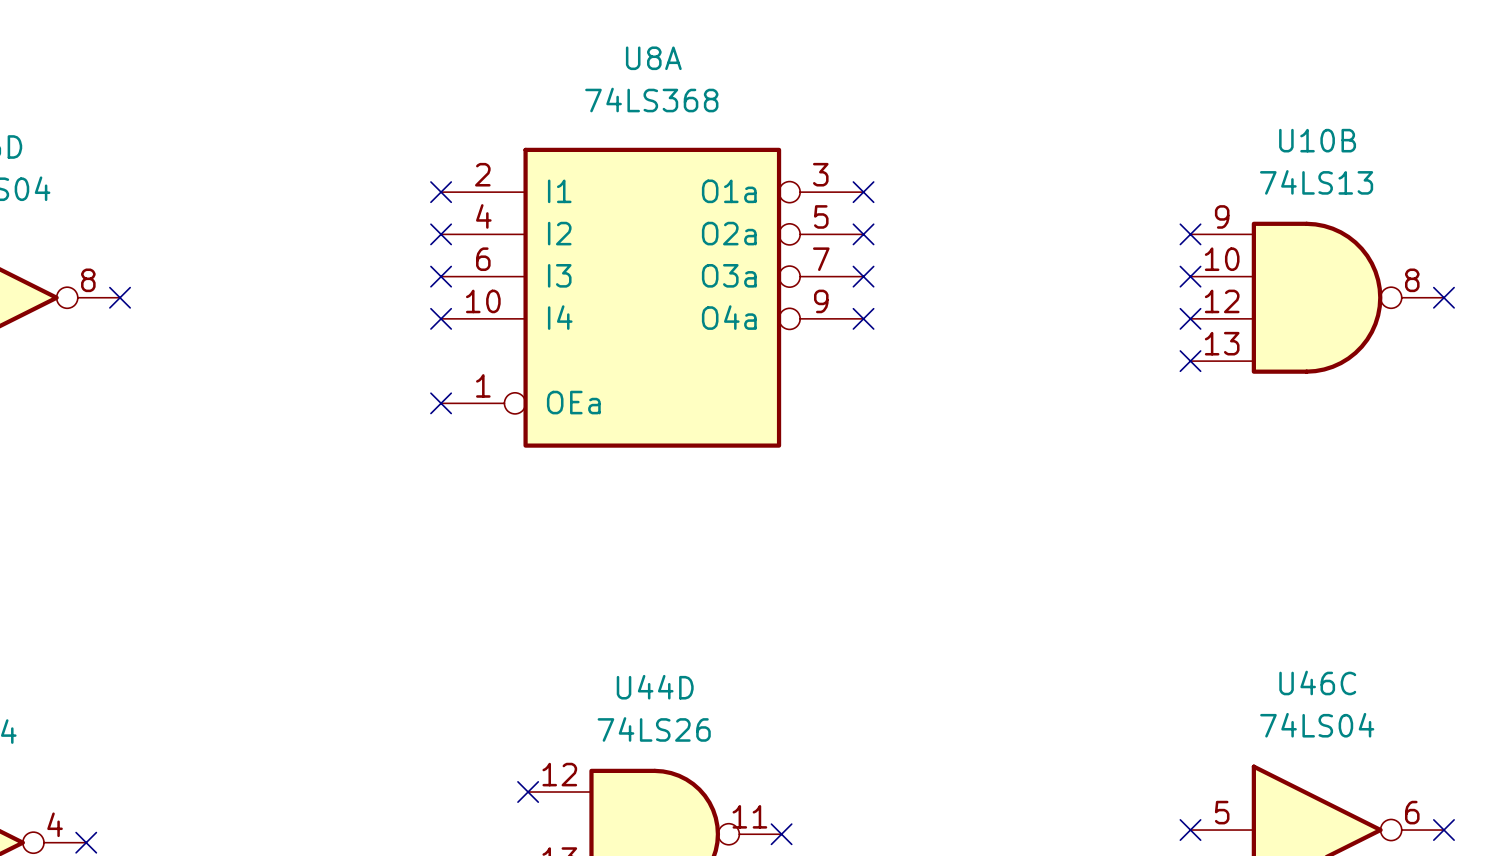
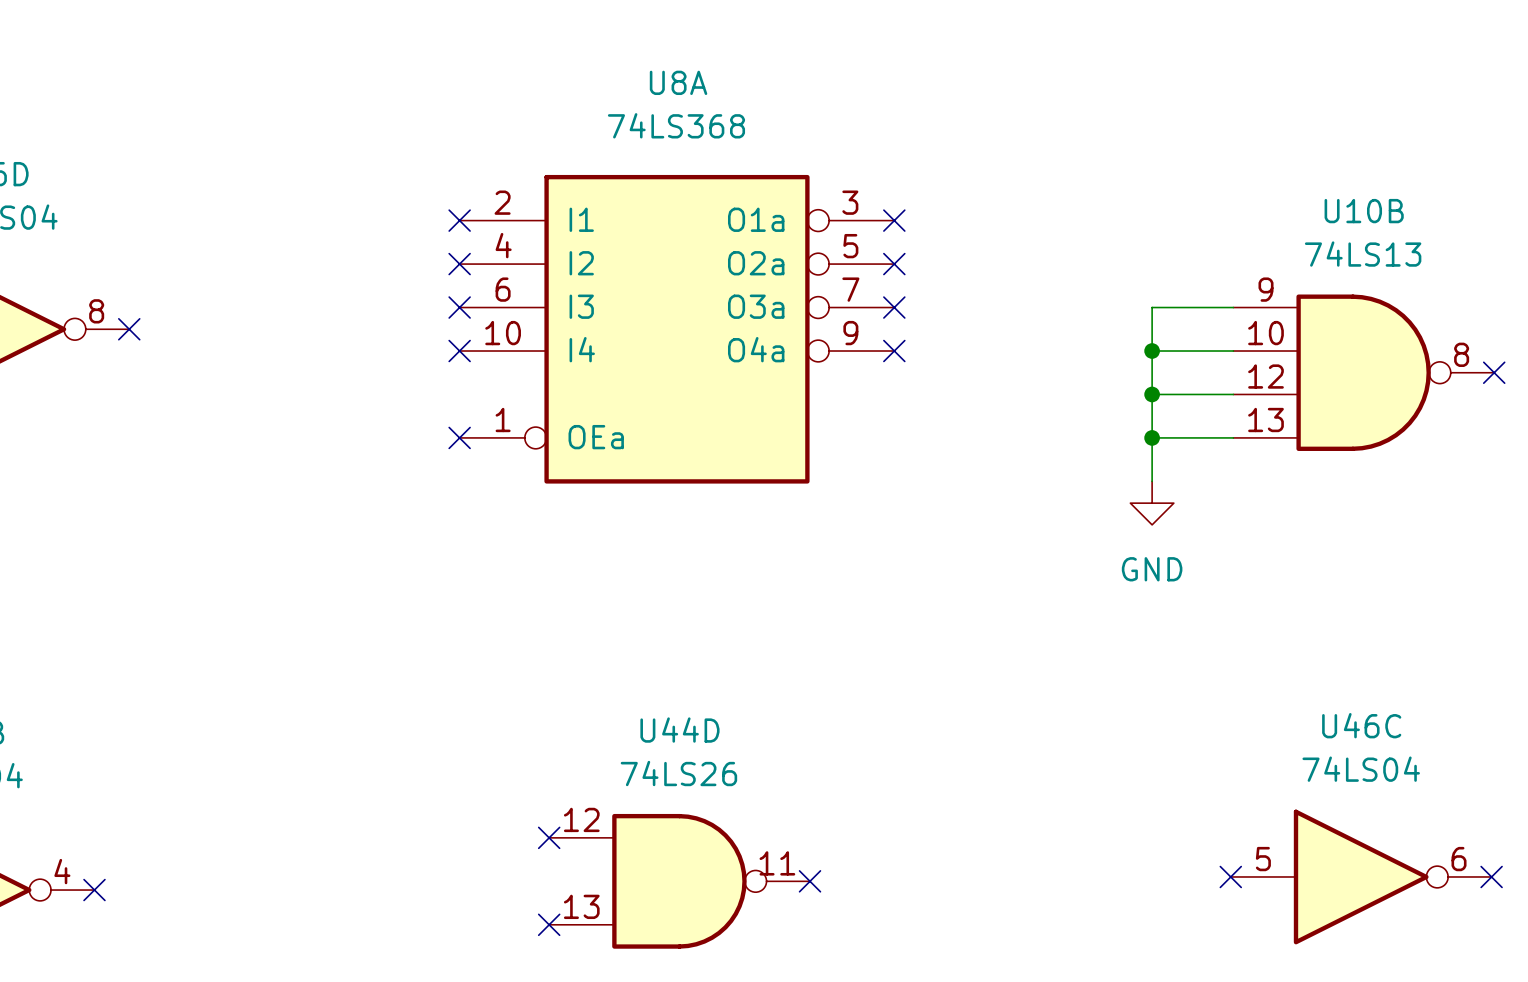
no-connect mark: (1190, 234) -> none
no-connect mark: (1190, 276) -> none
wire: none -> (1233, 307) (1152, 307) (1152, 481)
U10B position: (1317, 297) -> (1363, 372)
no-connect mark position: (1443, 297) -> (1494, 372)
wire: none -> (1152, 351) (1233, 351)
junction: none -> (1152, 351)
no-connect mark: (1190, 318) -> none
wire: none -> (1152, 394) (1233, 394)
junction: none -> (1152, 394)
no-connect mark: (1190, 361) -> none
wire: none -> (1152, 437) (1233, 437)
junction: none -> (1152, 437)
power symbol: none -> GND (1152, 503)

